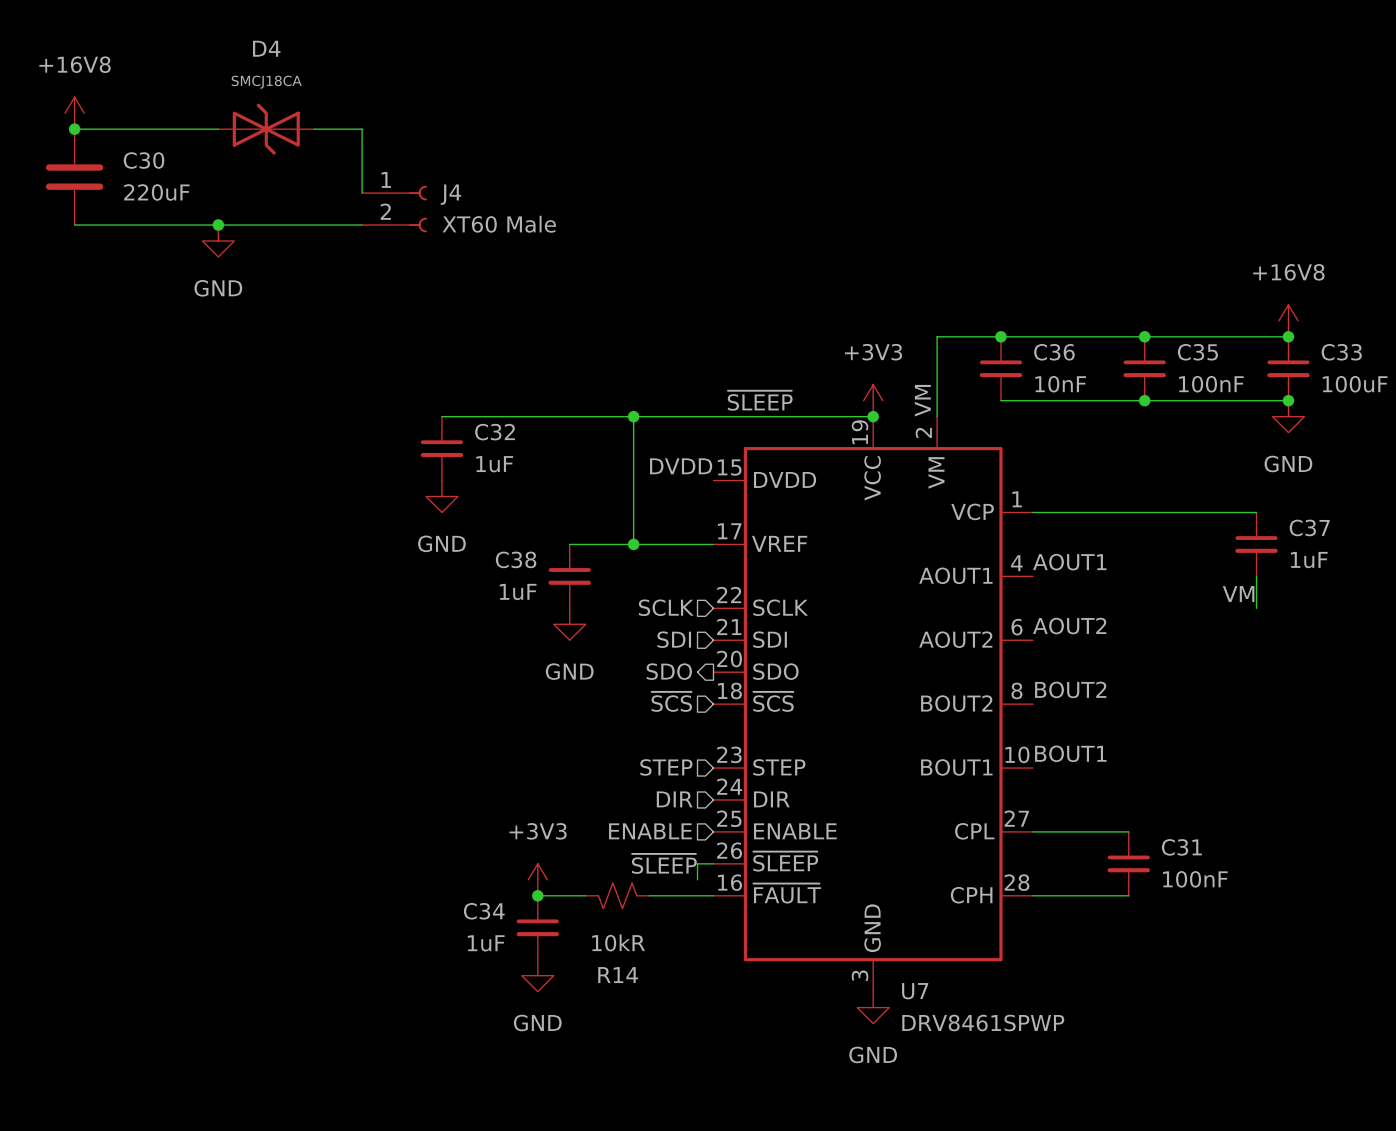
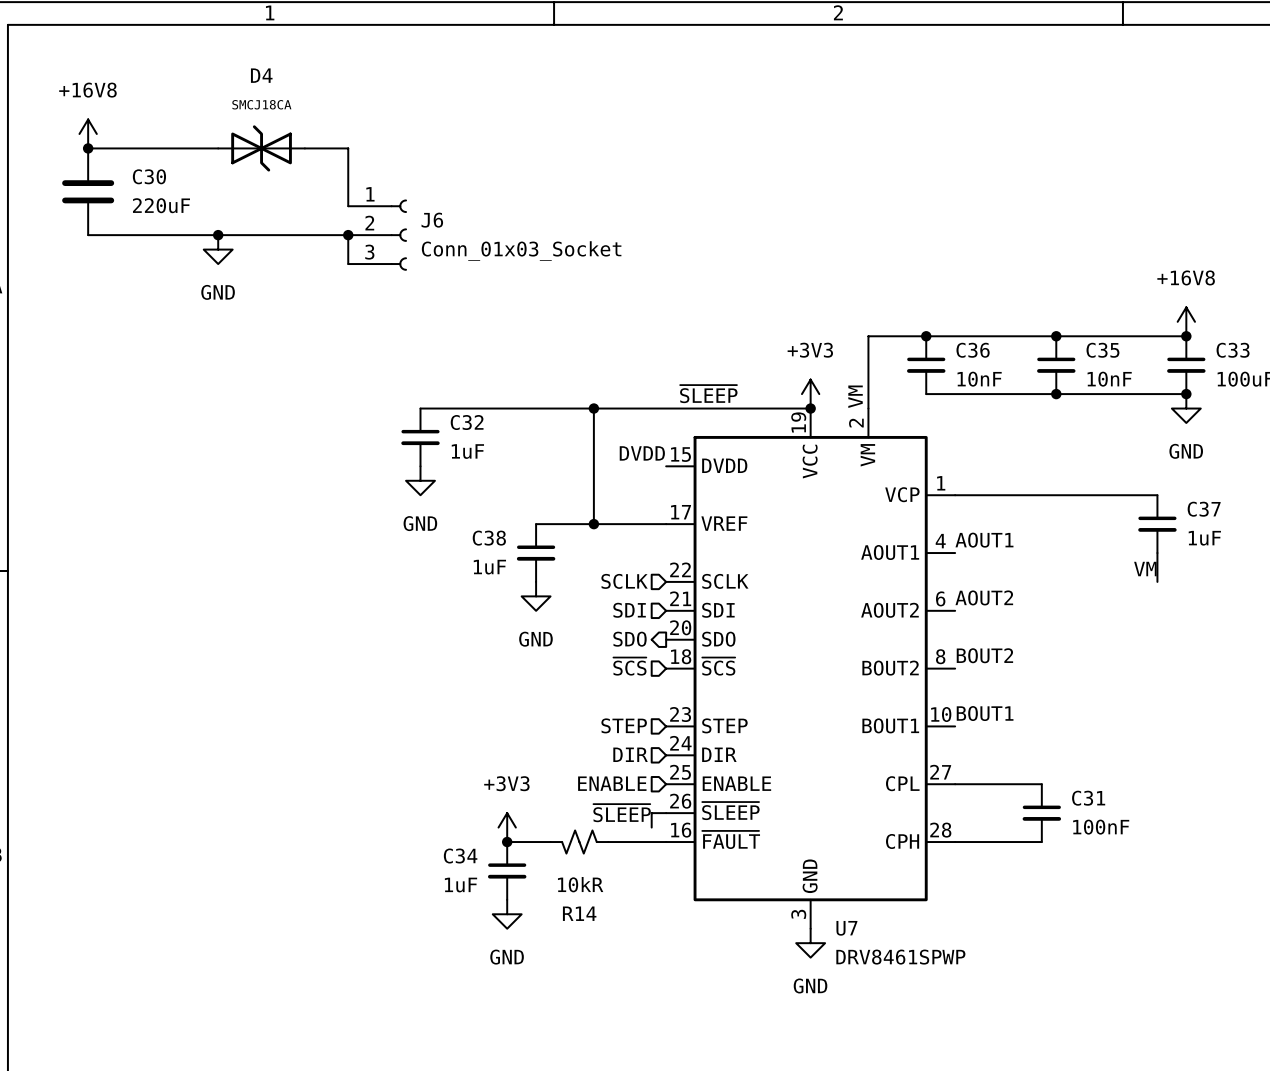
J4: XT60 Male (394, 209) -> none
wire: none -> (348, 235) (348, 264)
junction: none -> (348, 235)
J6: none -> Conn_01x03_Socket (377, 235)
C35 value: 100nF (1211, 384) -> 10nF (1109, 379)

